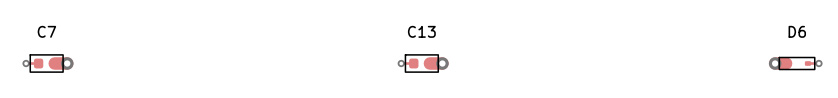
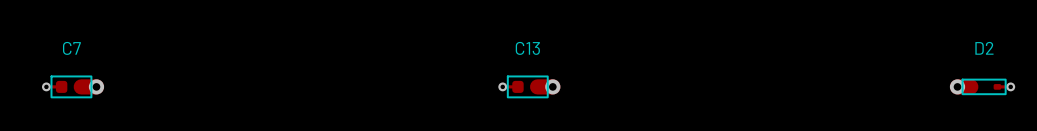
D6 name: D6 (797, 31) -> D2 (984, 48)

